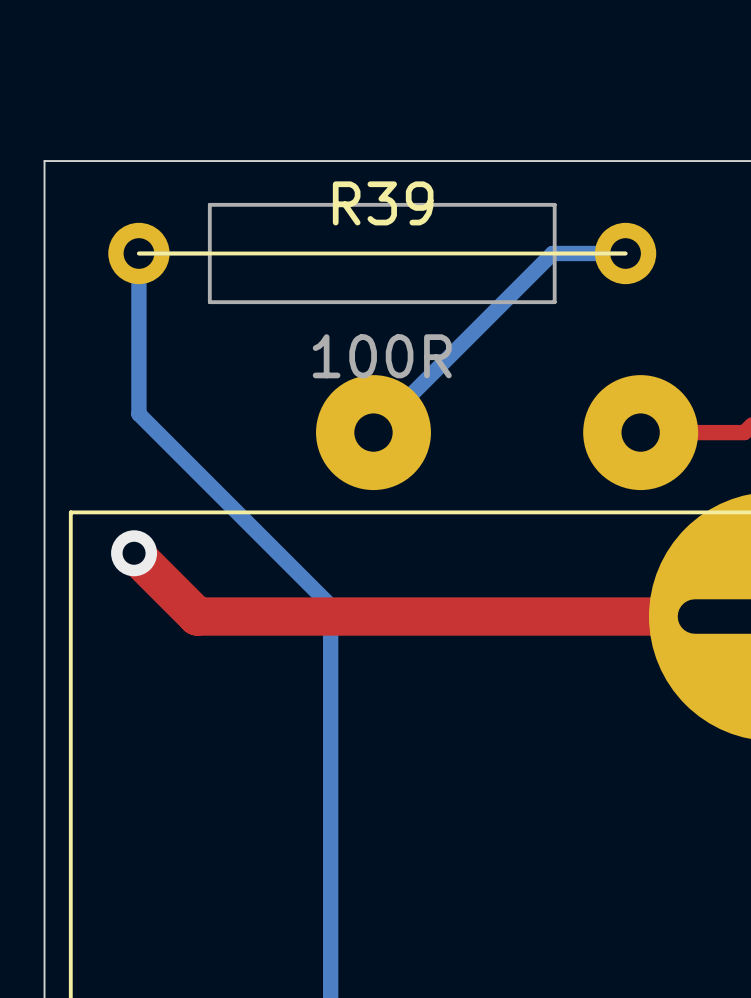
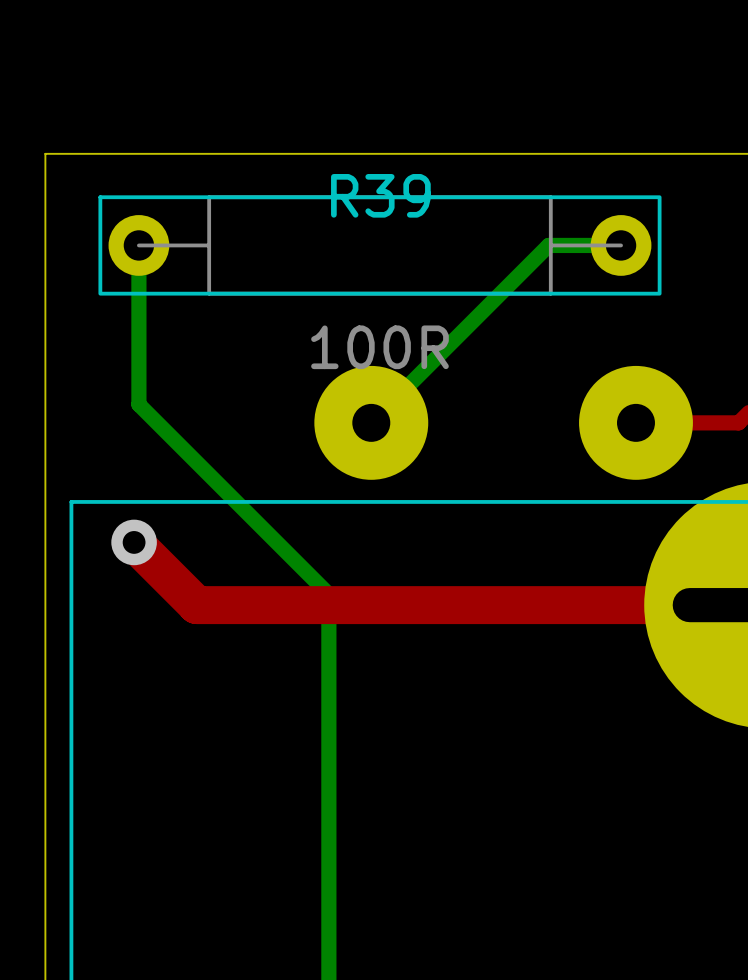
R39 footprint: [108, 202, 657, 305] -> [98, 195, 662, 296]

